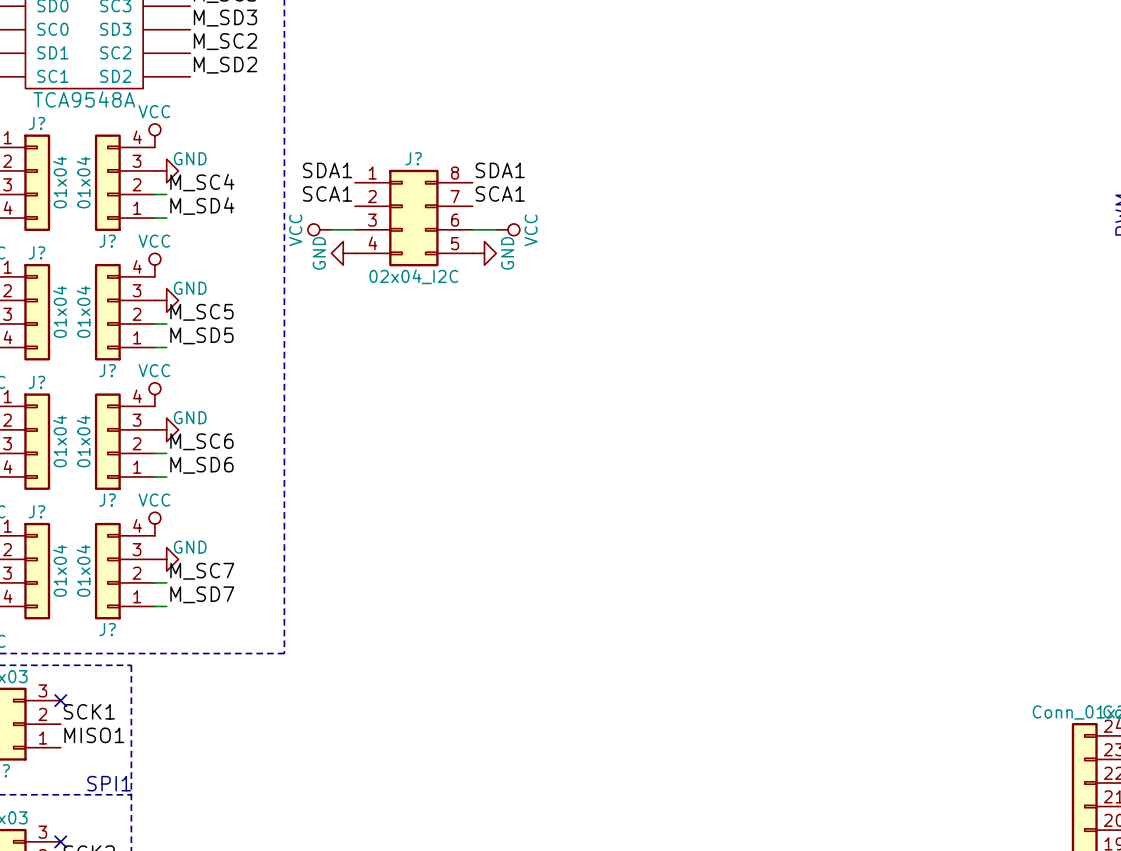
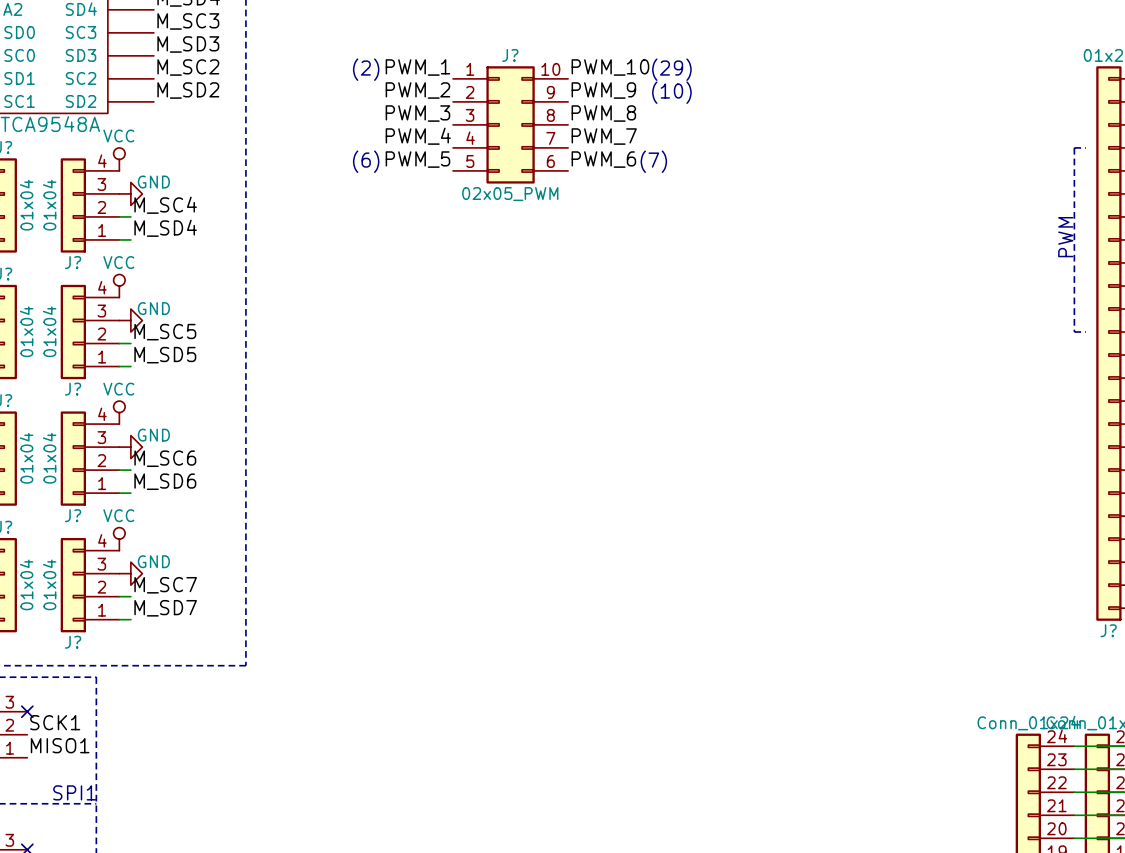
label: none -> PWM_1 (417, 67)
label: none -> PWM_10 (610, 67)
text: none -> (2) (366, 69)
text: none -> (29) (671, 69)
label: none -> PWM_2 (417, 90)
label: none -> PWM_9 (603, 90)
text: none -> (10) (671, 92)
label: none -> PWM_3 (417, 113)
label: none -> PWM_8 (603, 113)
J?: none -> 02x05_PWM (510, 124)
label: none -> PWM_4 (418, 136)
label: none -> PWM_7 (604, 136)
label: none -> PWM_5 (417, 159)
label: none -> PWM_6 (603, 159)
text: none -> (6) (366, 161)
text: none -> (7) (653, 161)
label: SDA1 (327, 170) -> none
label: SDA1 (500, 170) -> none
label: SCA1 (327, 193) -> none
label: SCA1 (500, 193) -> none
J?: 02x04_I2C (413, 218) -> none
power symbol: VCC (319, 229) -> none
wire: (331, 229) (355, 229) -> none
wire: (472, 229) (496, 229) -> none
power symbol: VCC (508, 229) -> none
power symbol: GND (343, 253) -> none
power symbol: GND (484, 253) -> none

